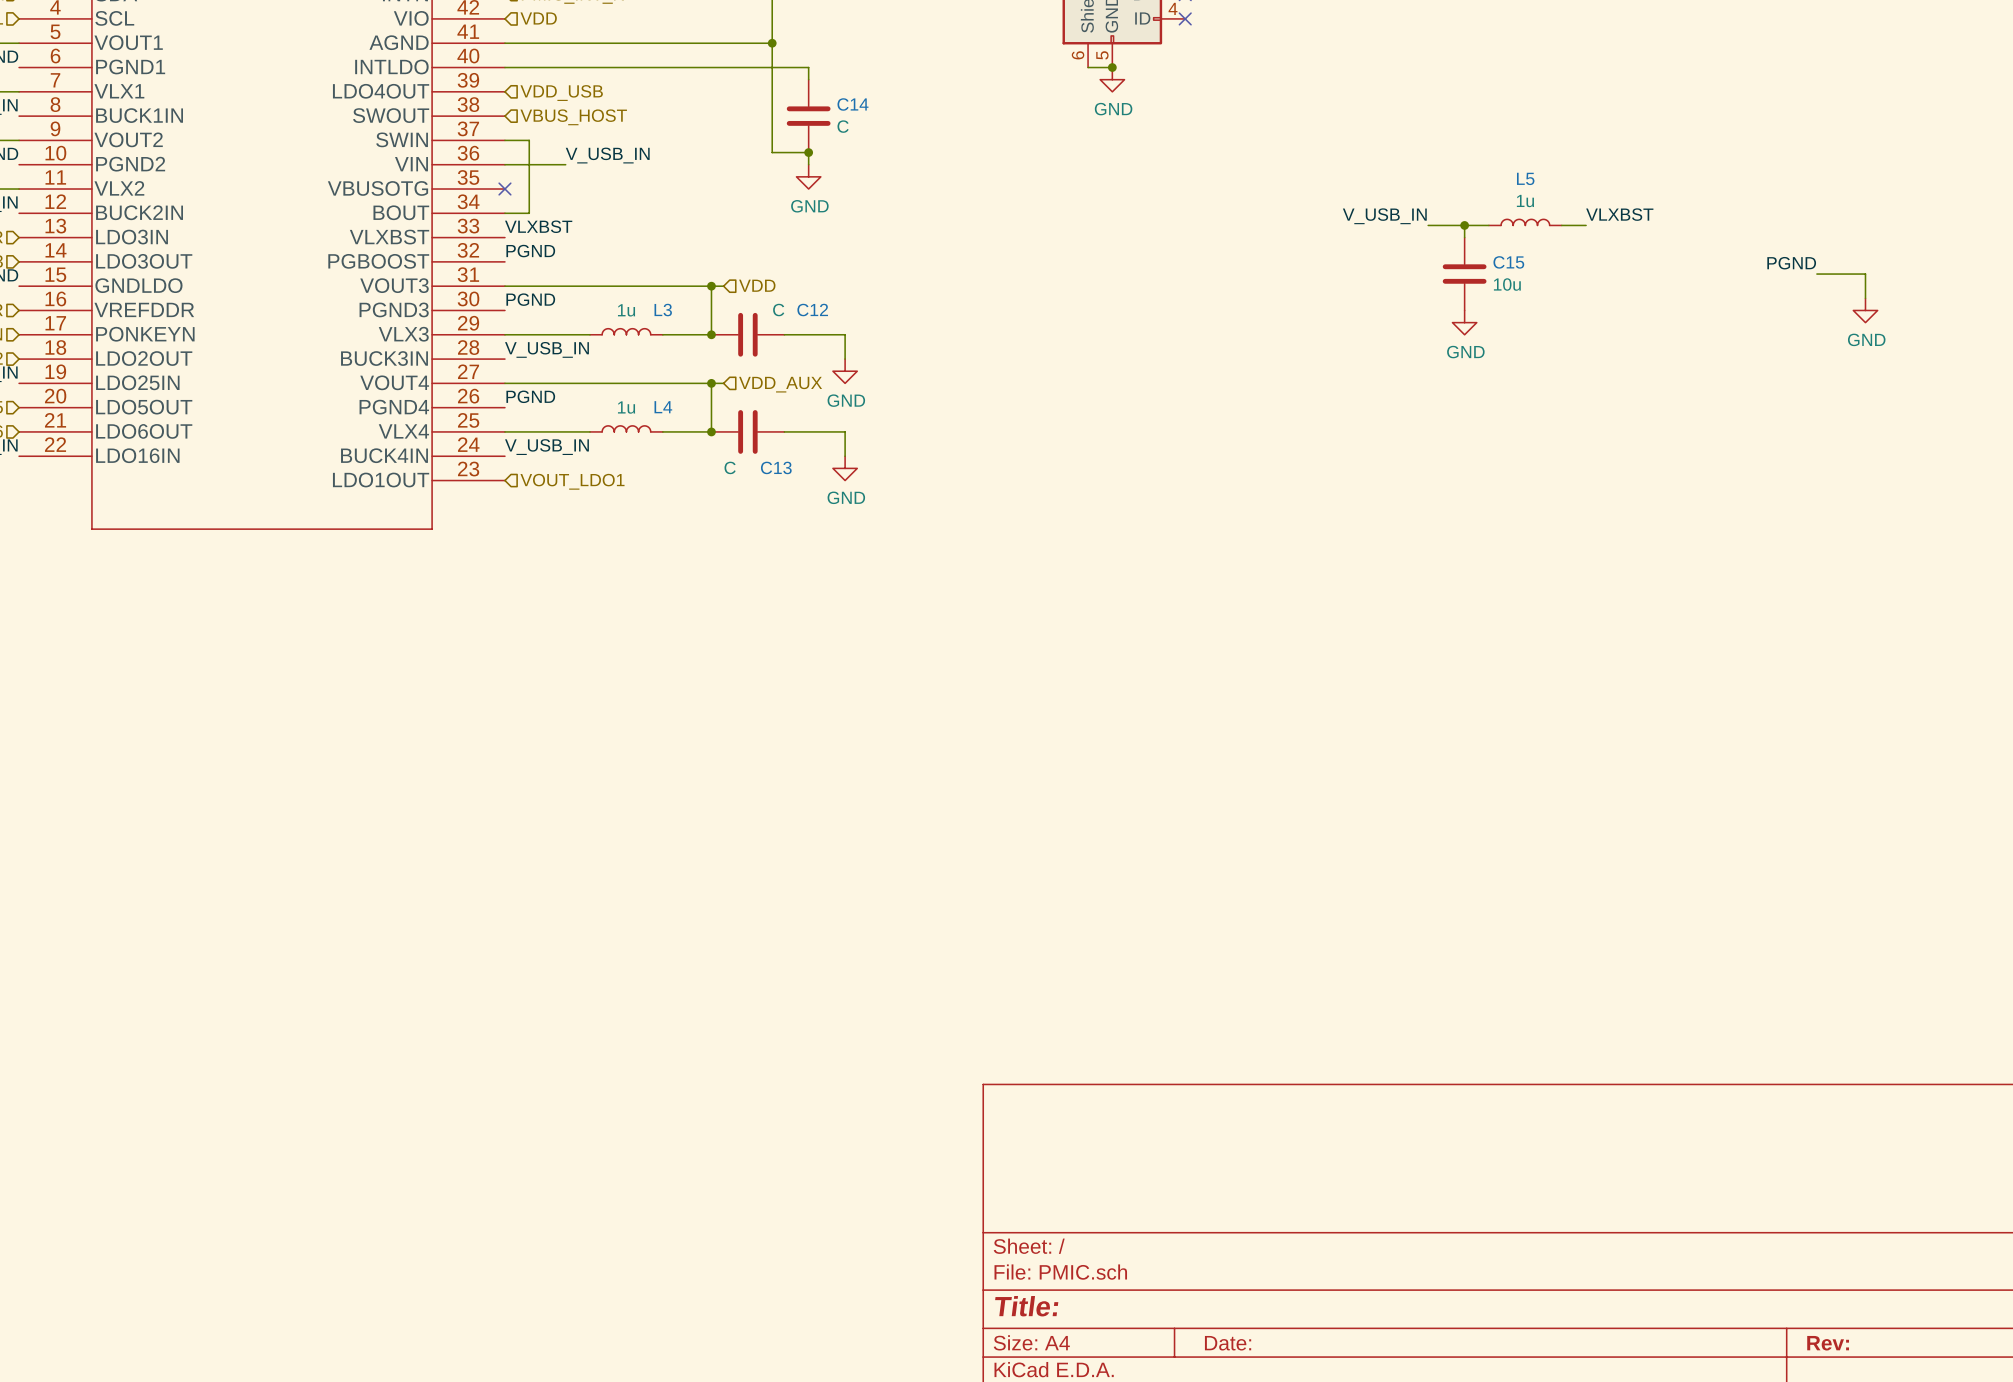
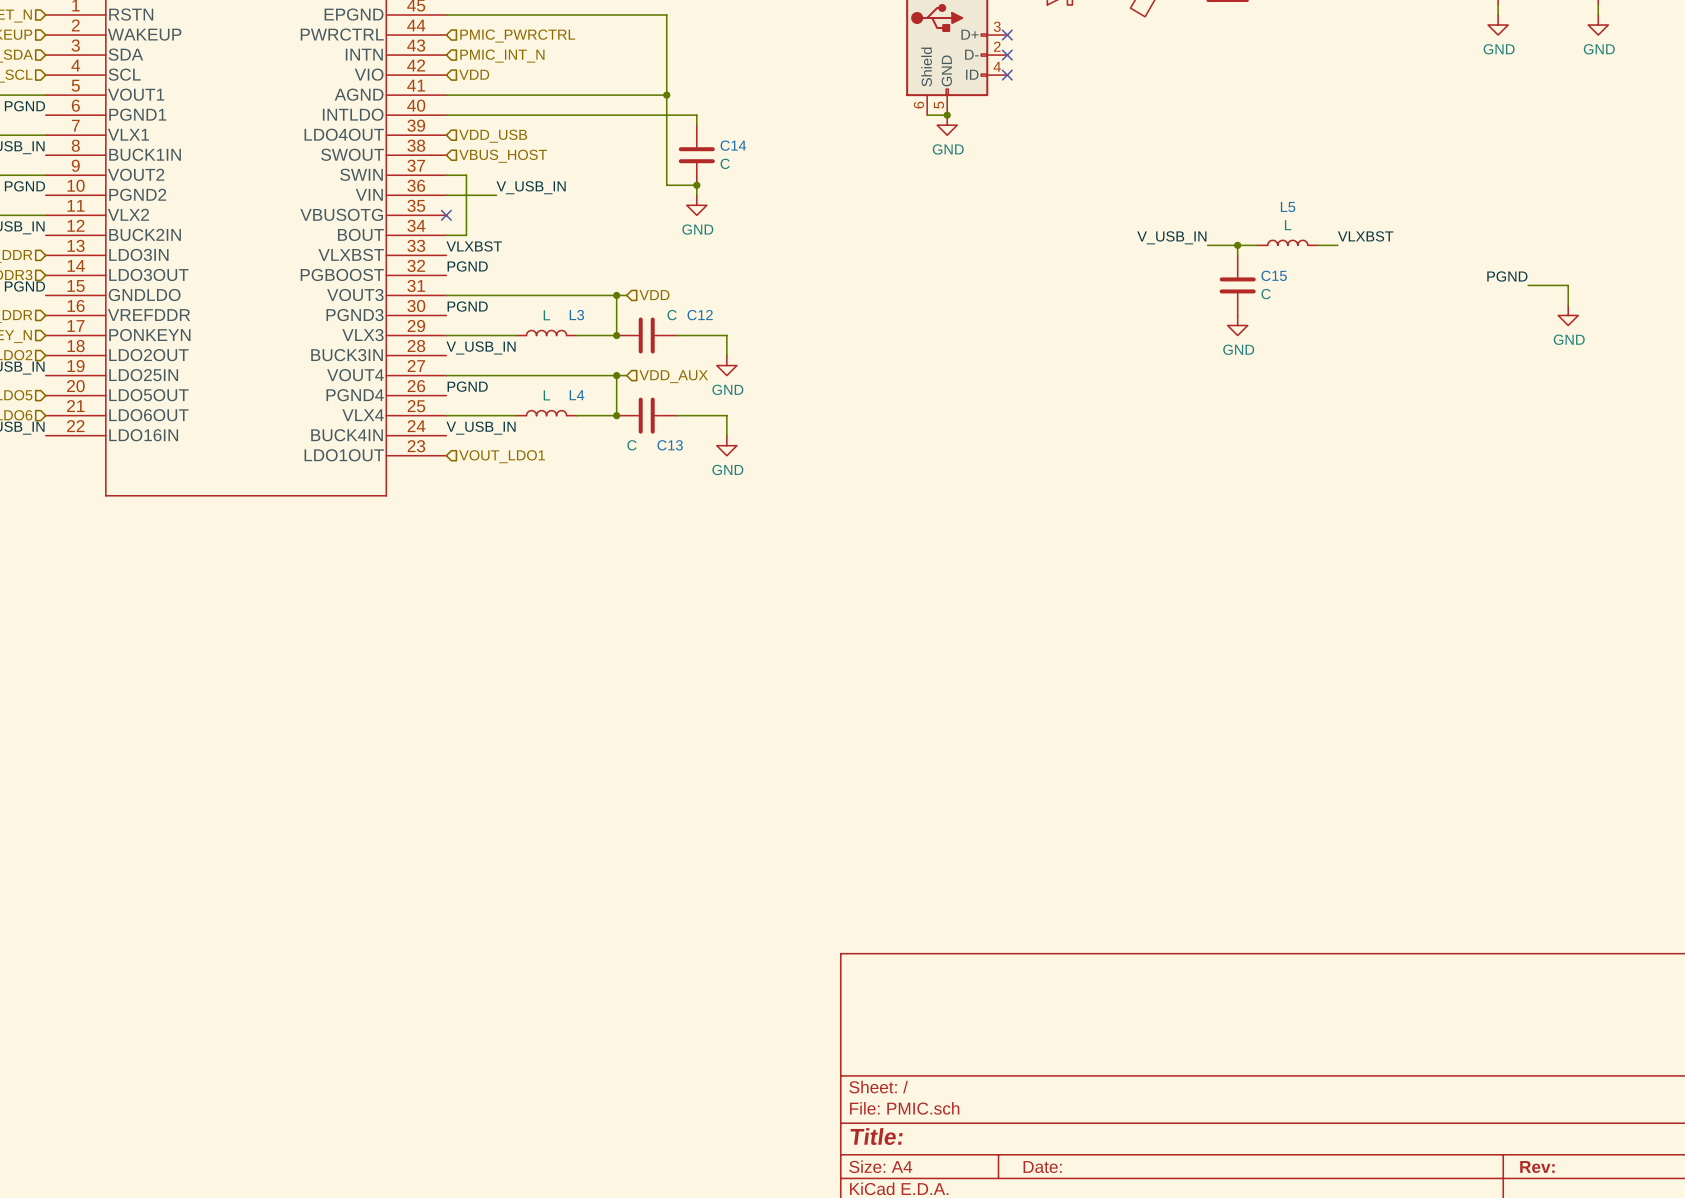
L5 value: 1u (1525, 201) -> L (1288, 225)
C15 value: 10u (1507, 284) -> C (1266, 294)
L3 value: 1u (626, 310) -> L (546, 315)
L4 value: 1u (626, 407) -> L (546, 395)

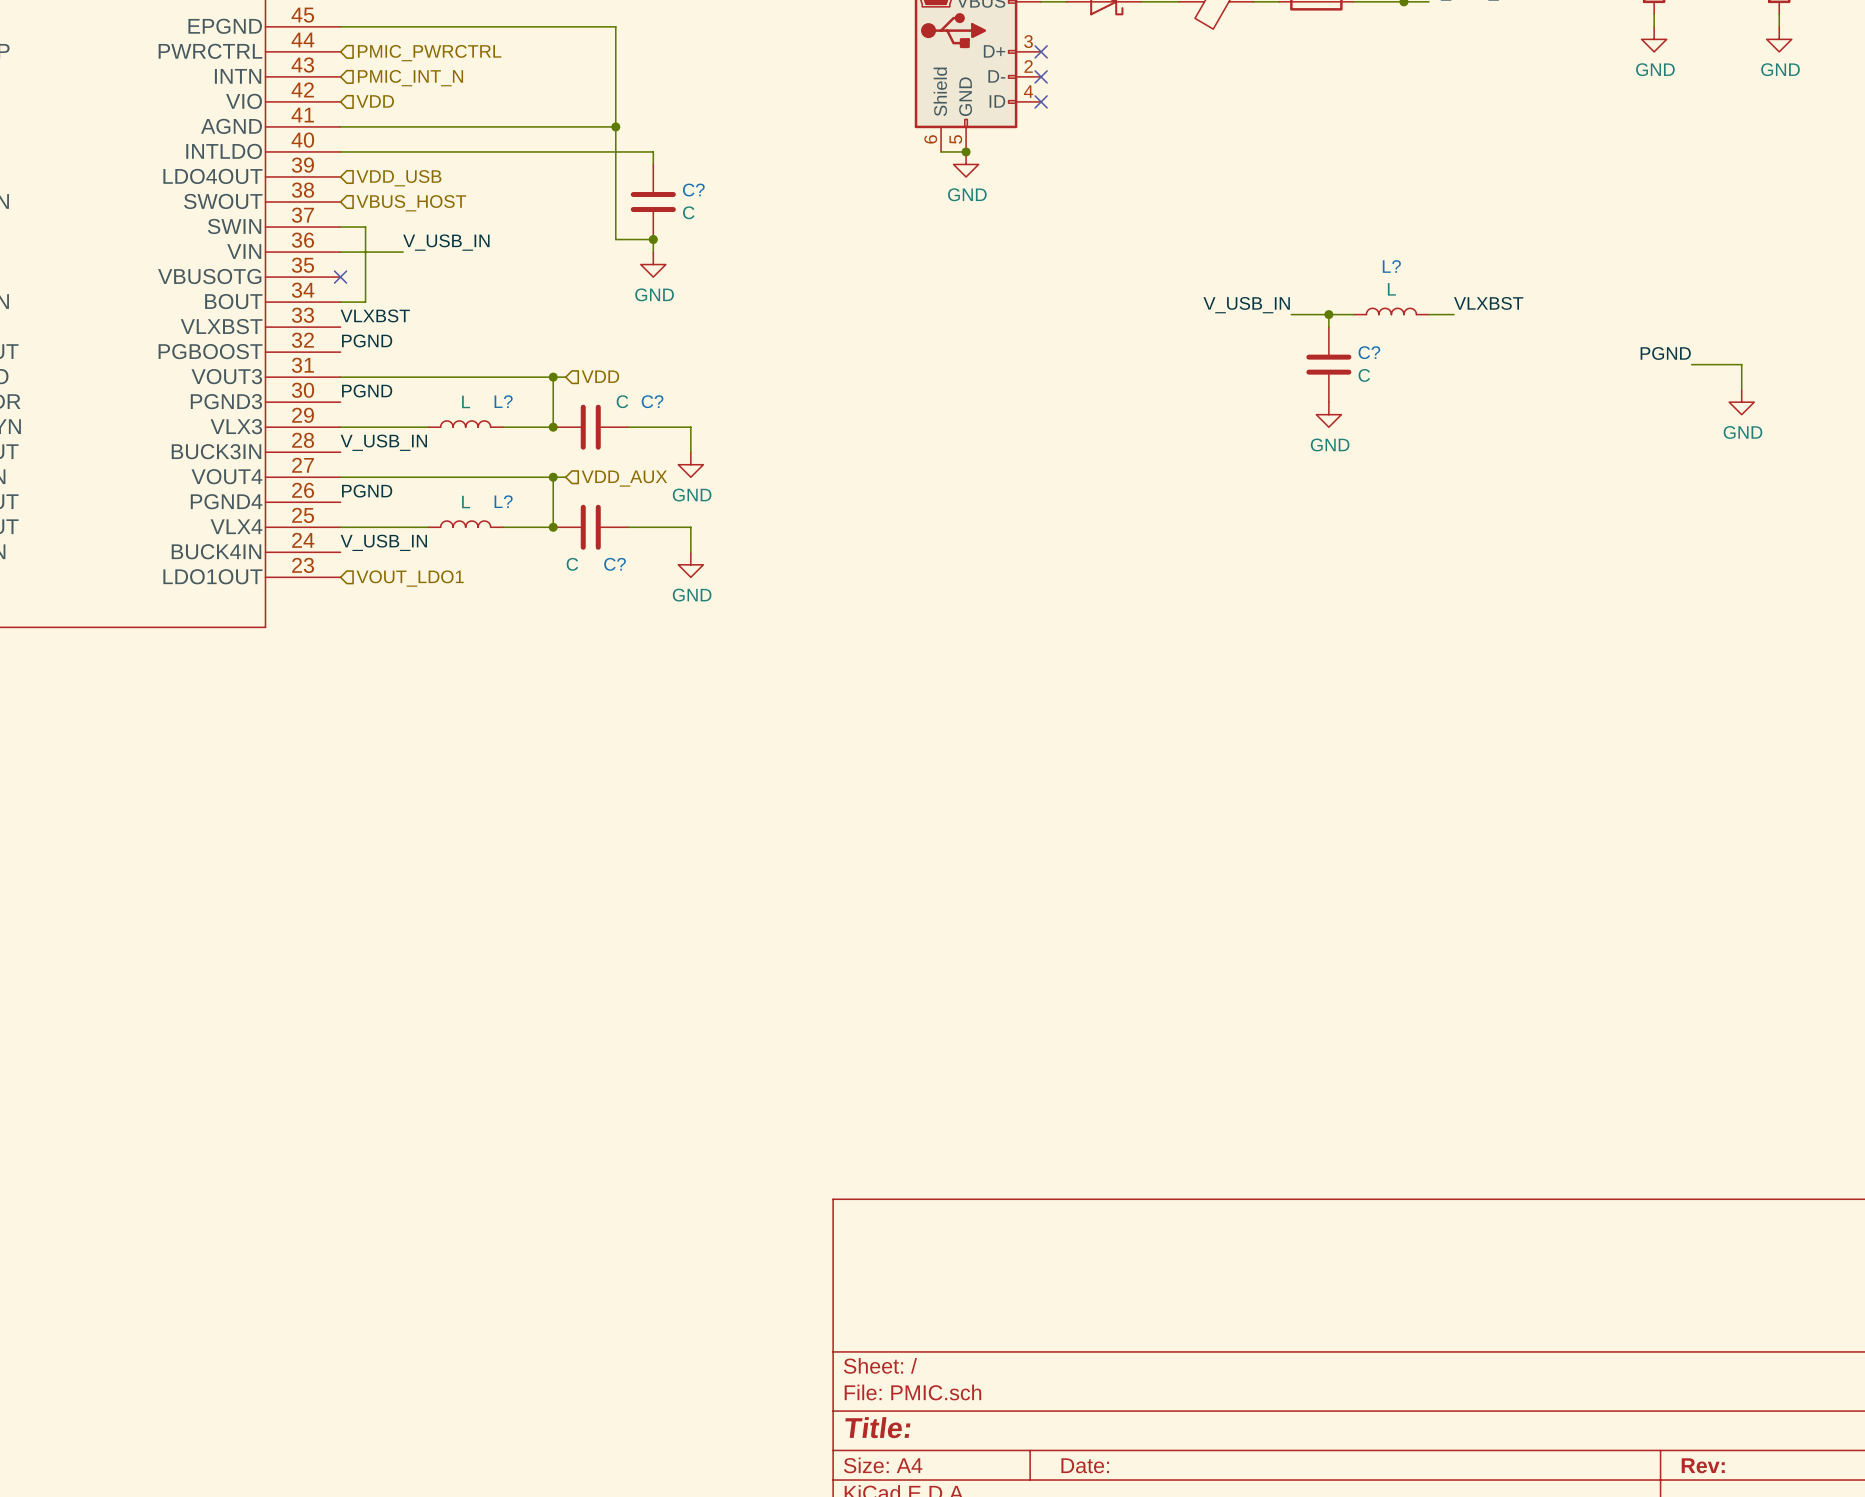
C14 name: C14 (733, 145) -> C? (693, 190)
L5 name: L5 (1288, 207) -> L? (1391, 266)
C15 name: C15 (1274, 275) -> C? (1369, 352)
L3 name: L3 (576, 315) -> L? (503, 401)
C12 name: C12 (700, 315) -> C? (652, 401)
L4 name: L4 (576, 395) -> L? (503, 501)
C13 name: C13 (670, 445) -> C? (615, 564)

